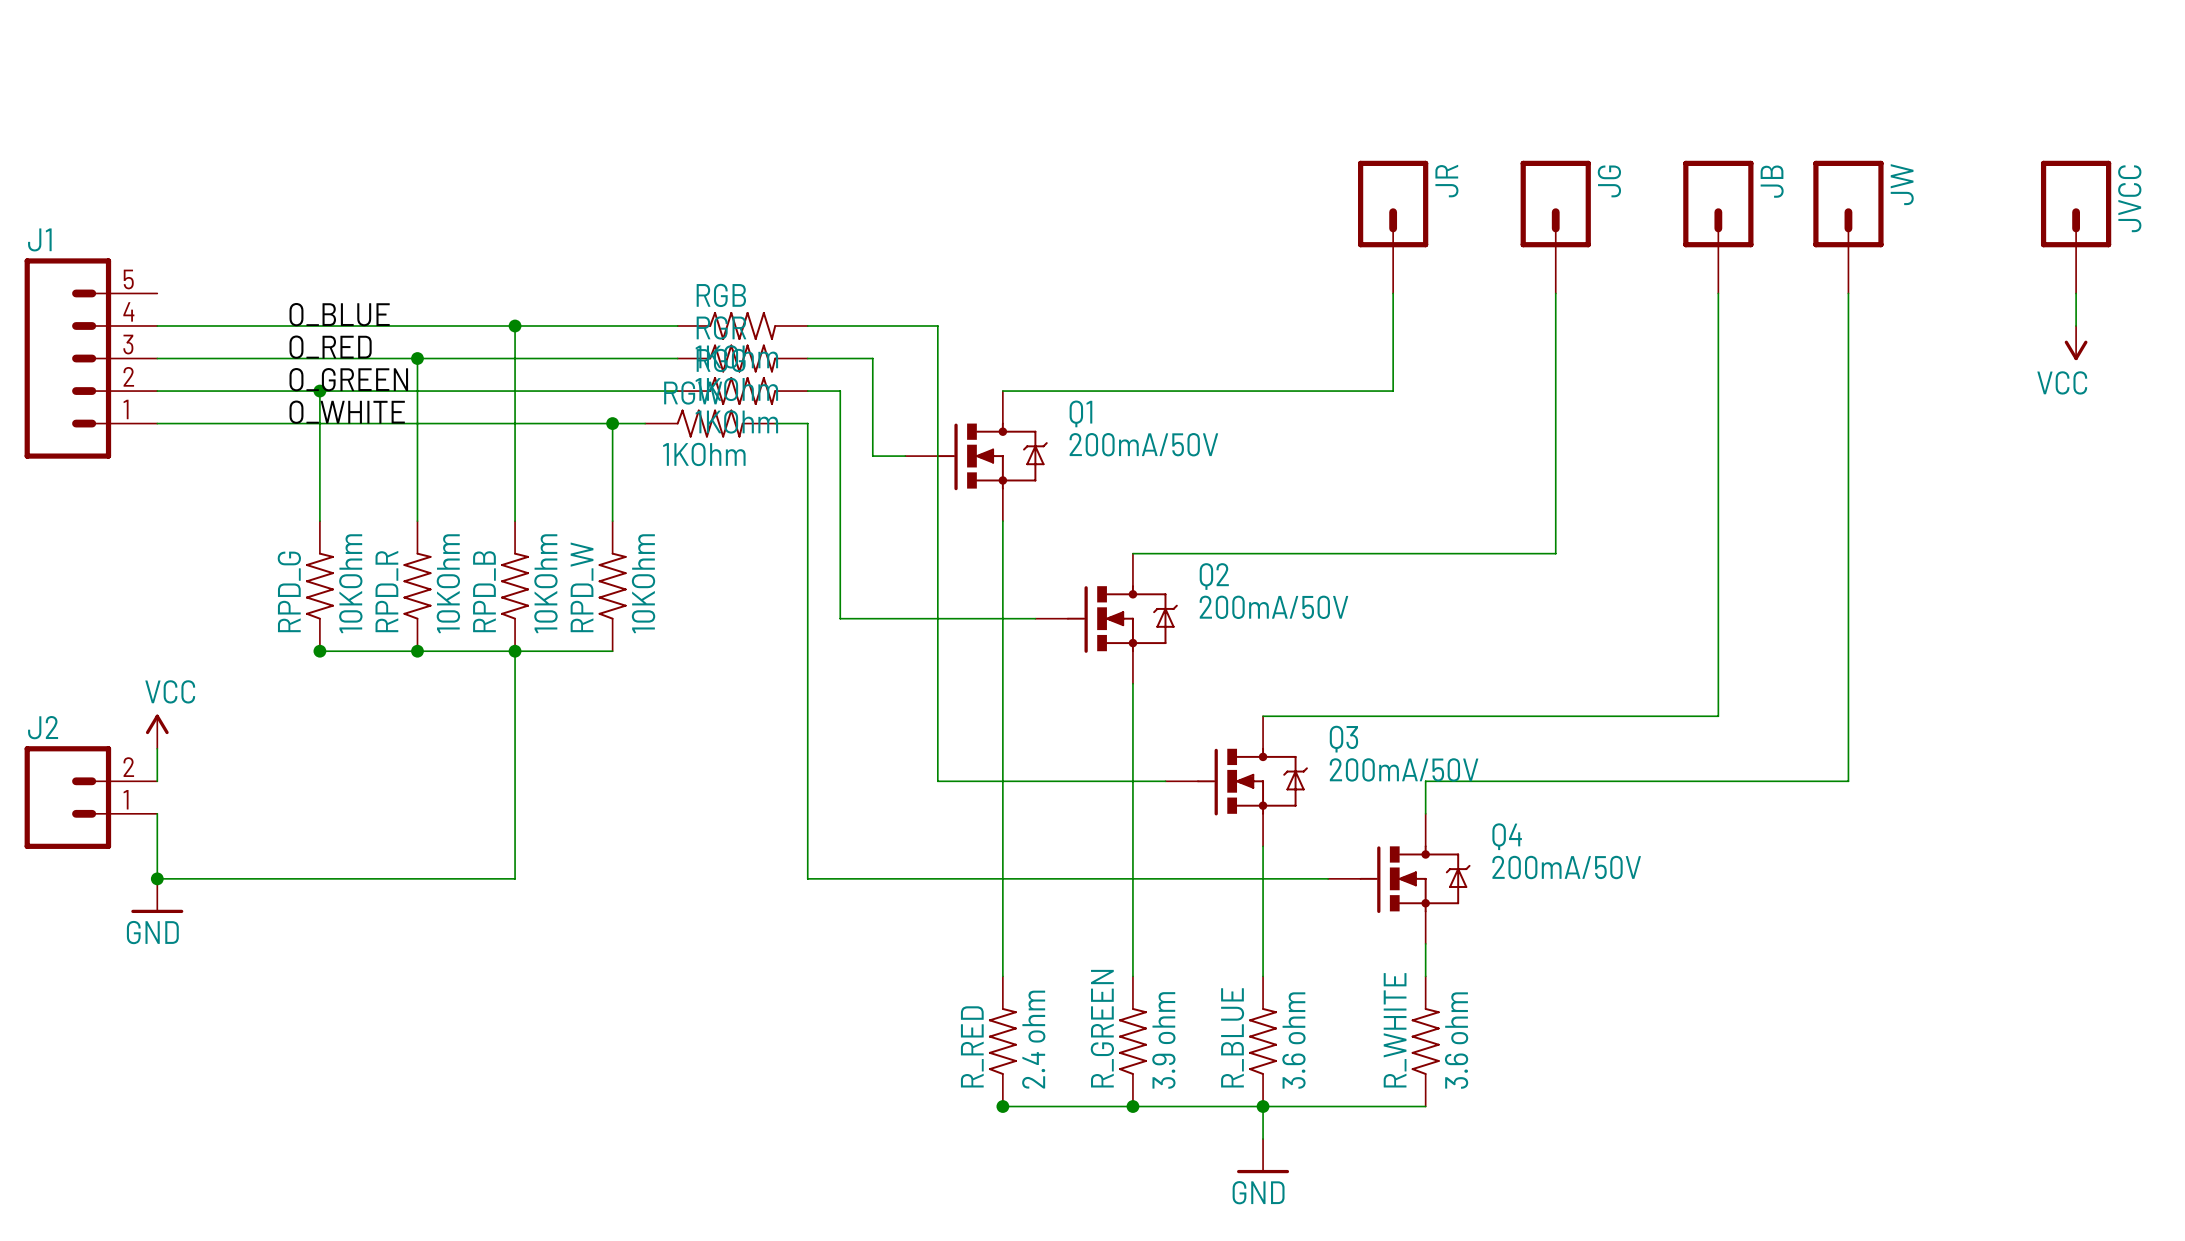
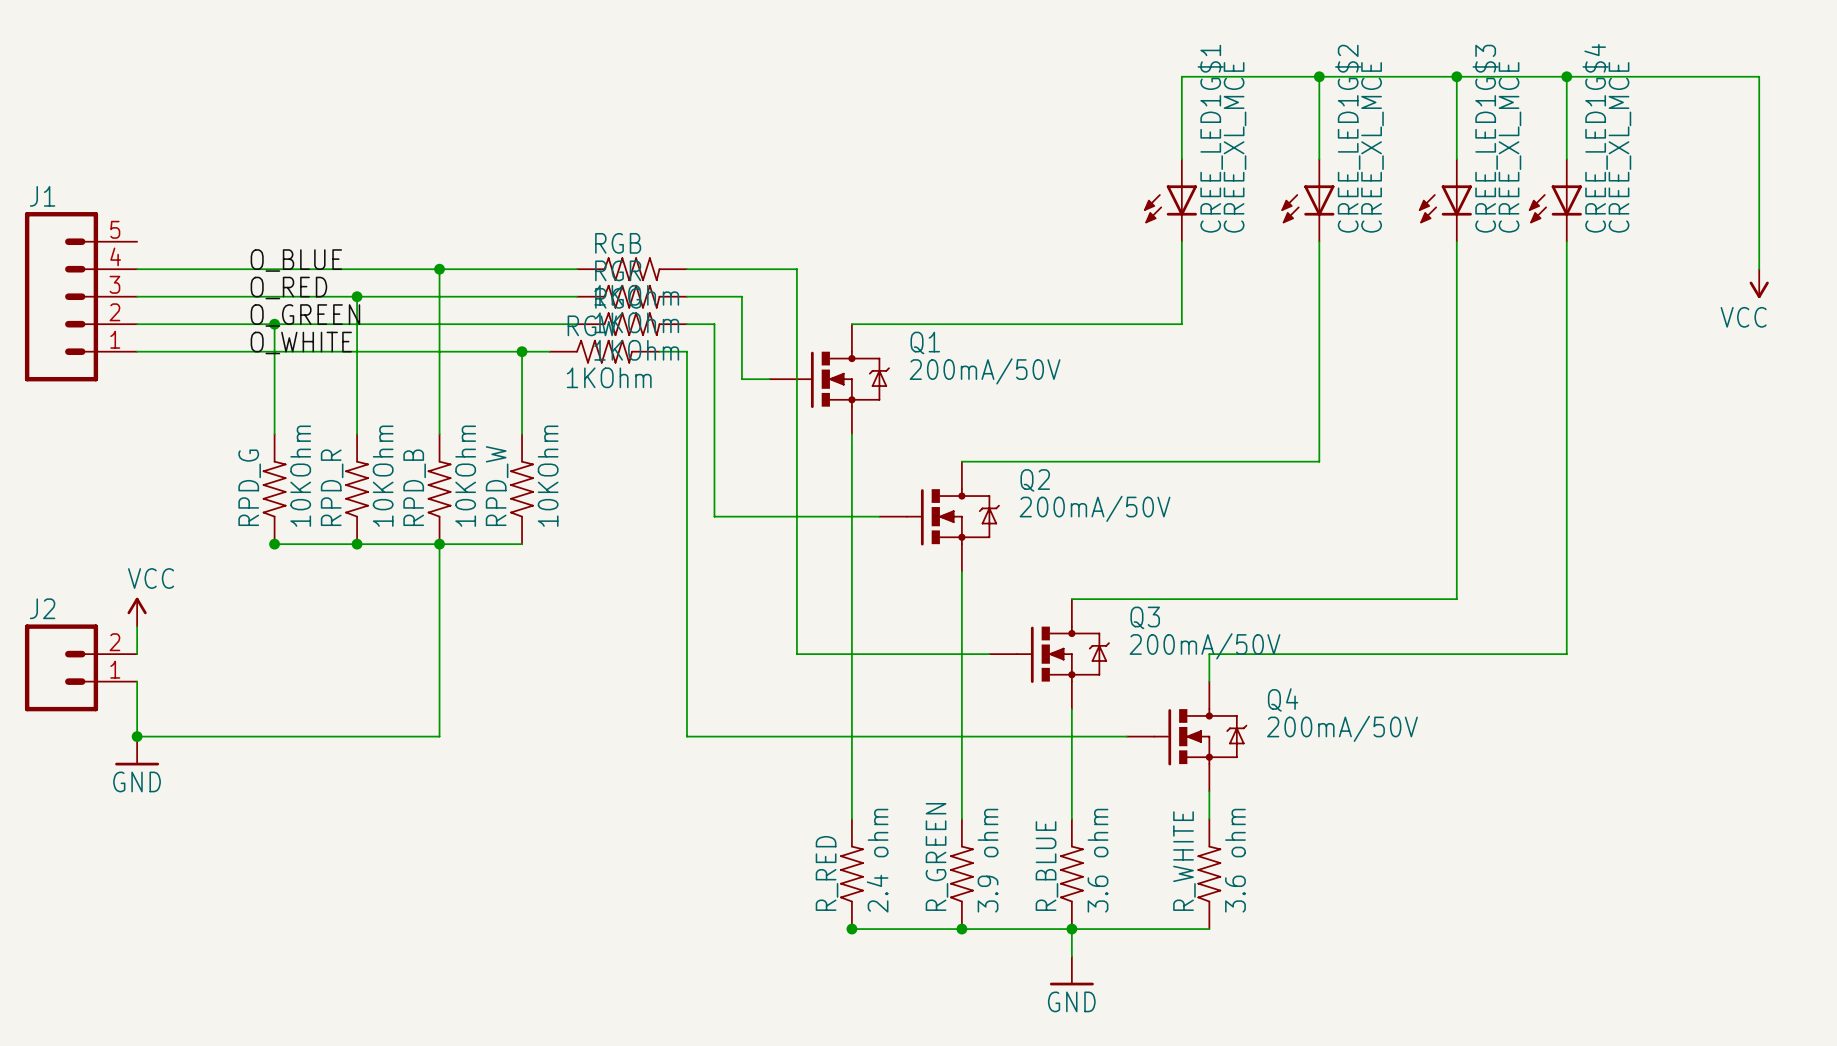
wire: none -> (1319, 76) (1319, 159)
junction: none -> (1319, 76)
wire: none -> (1456, 76) (1456, 159)
junction: none -> (1456, 76)
wire: none -> (1566, 76) (1566, 159)
junction: none -> (1566, 76)
wire: none -> (1181, 159) (1181, 76) (1759, 76) (1759, 241)
JR: (1393, 227) -> none
JG: (1555, 227) -> none
JB: (1718, 227) -> none
JW: (1848, 227) -> none
JVCC: (2076, 227) -> none
CREE_LED1G$1: none -> CREE_XL_MCE (1170, 200)
CREE_LED1G$2: none -> CREE_XL_MCE (1307, 200)
CREE_LED1G$3: none -> CREE_XL_MCE (1445, 200)
CREE_LED1G$4: none -> CREE_XL_MCE (1555, 200)

